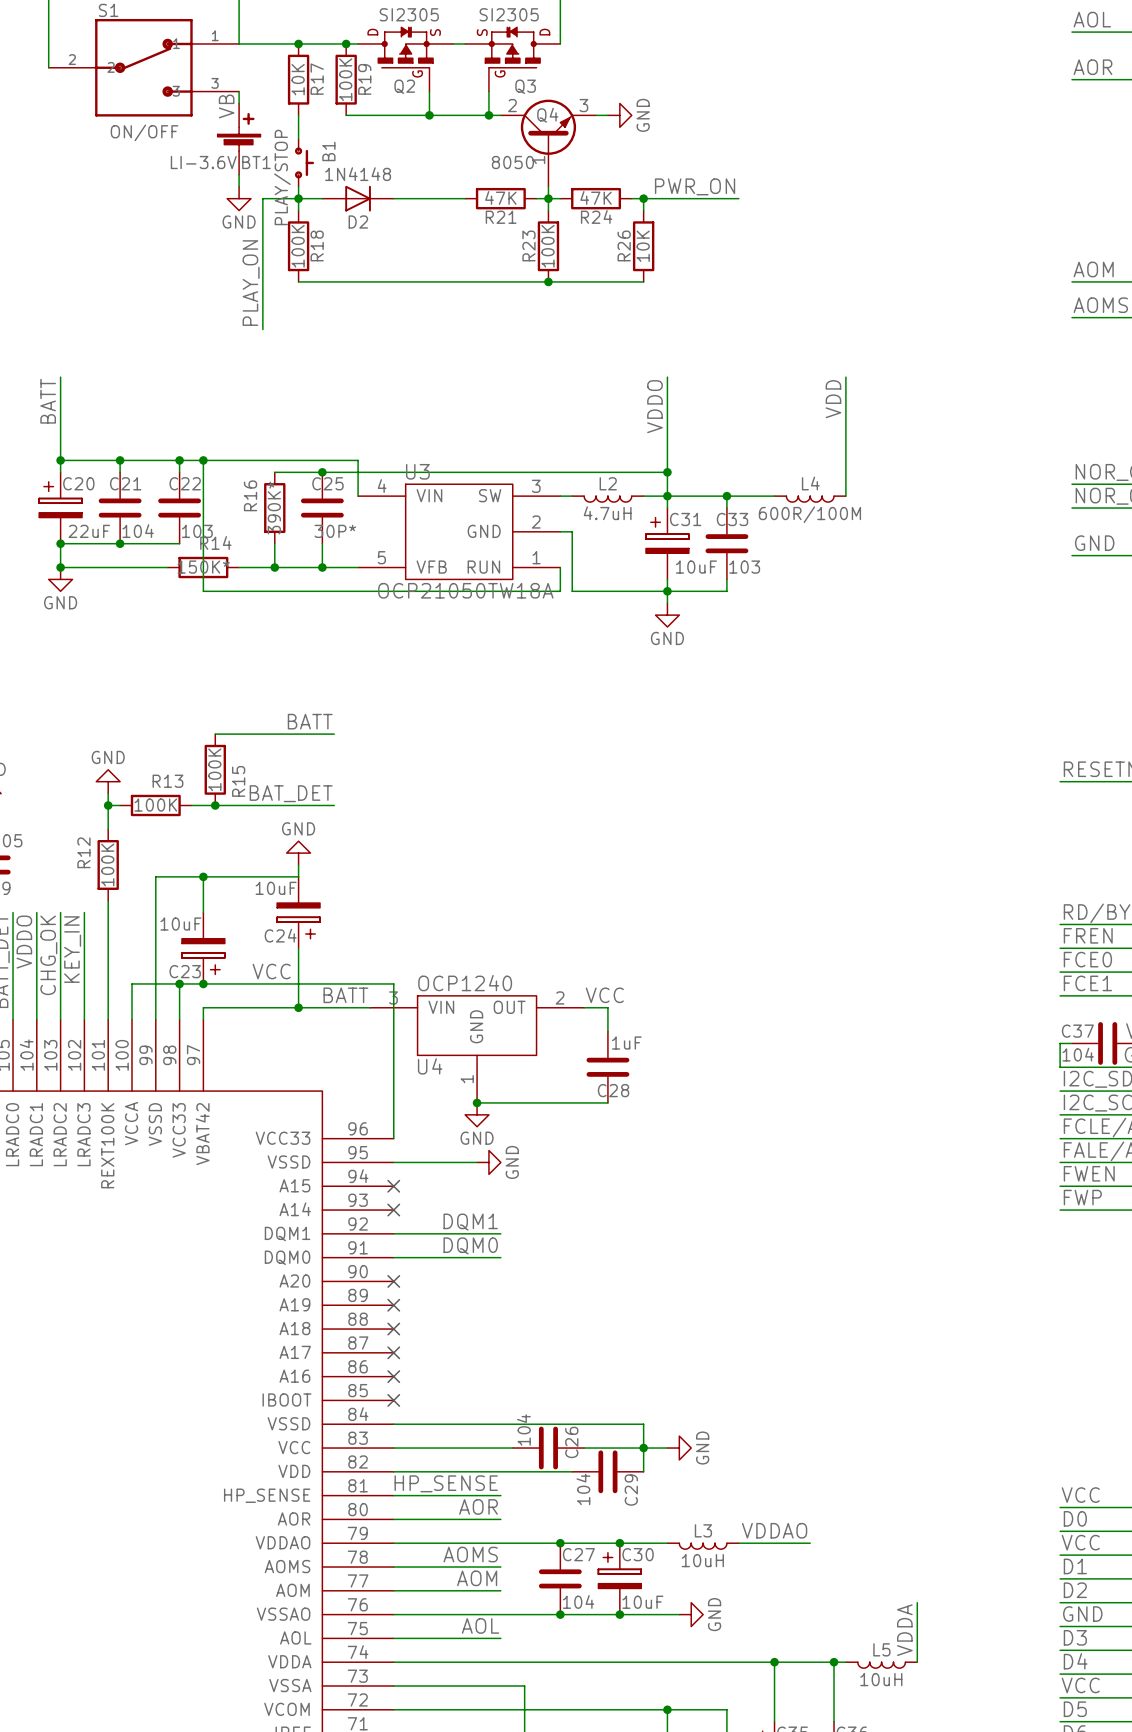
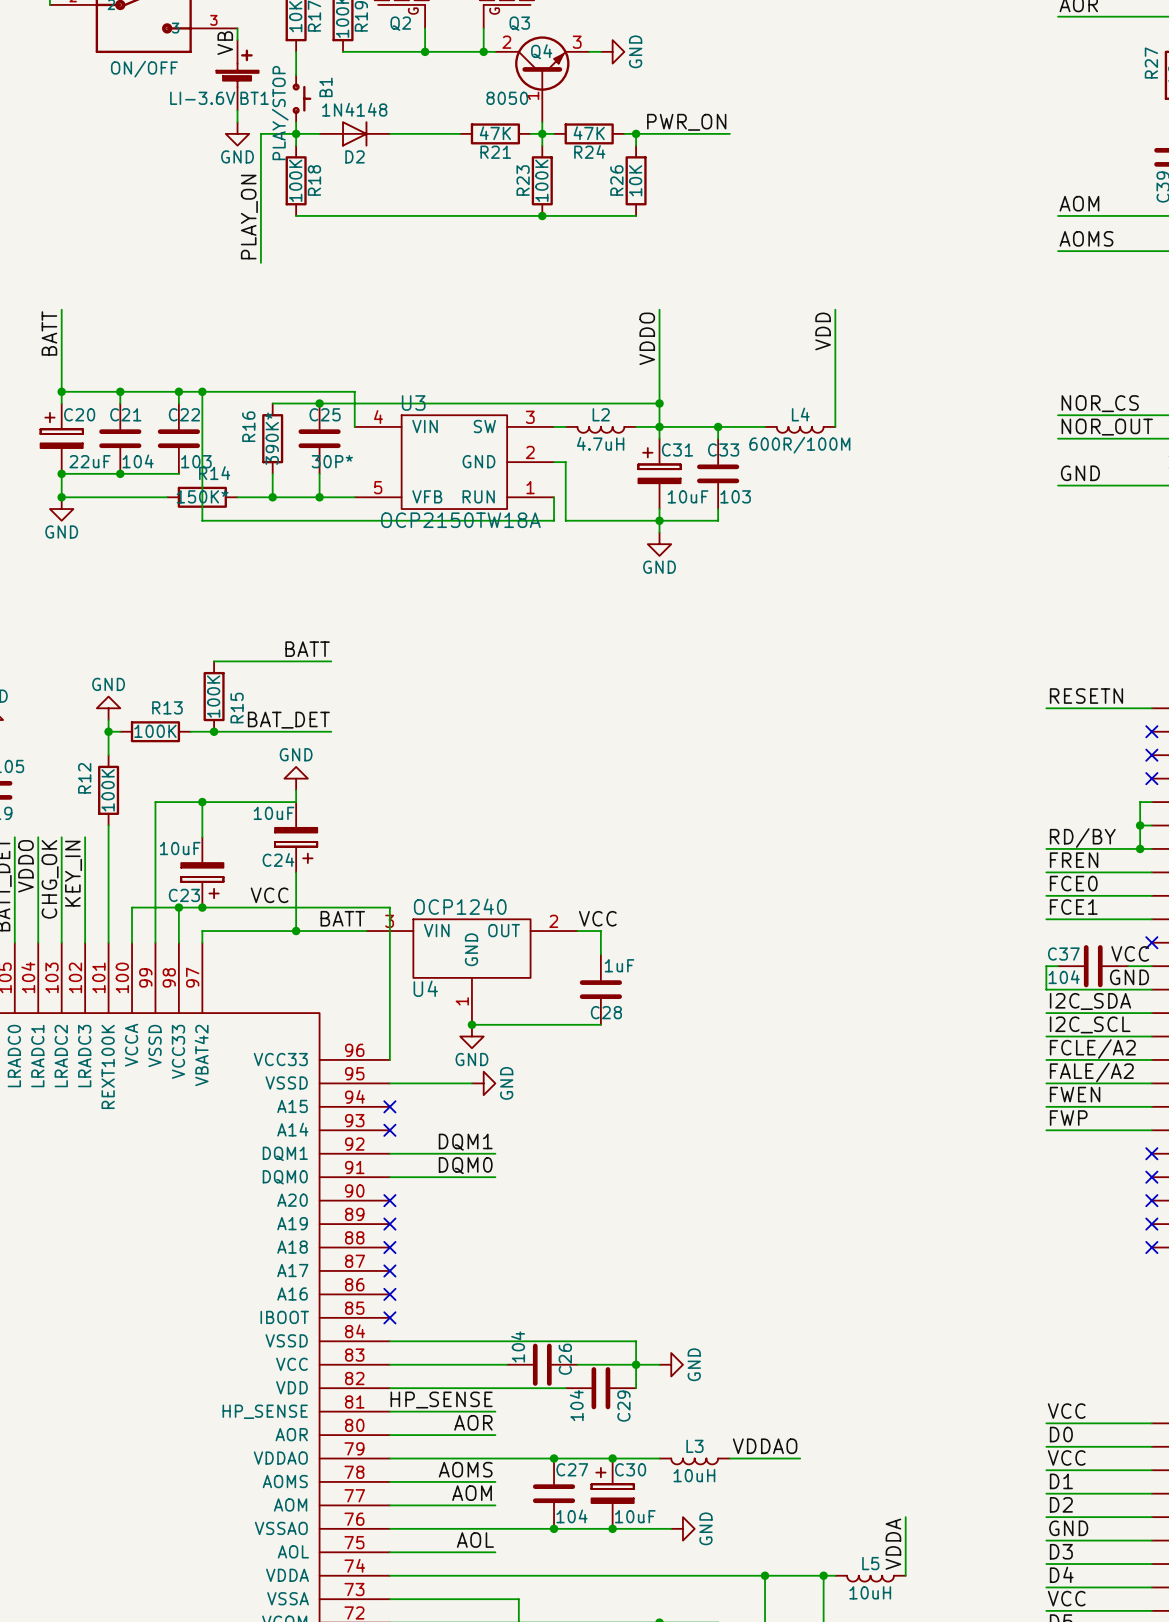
U3 value: OCP21050TW18A (465, 590) -> OCP2150TW18A (460, 520)

